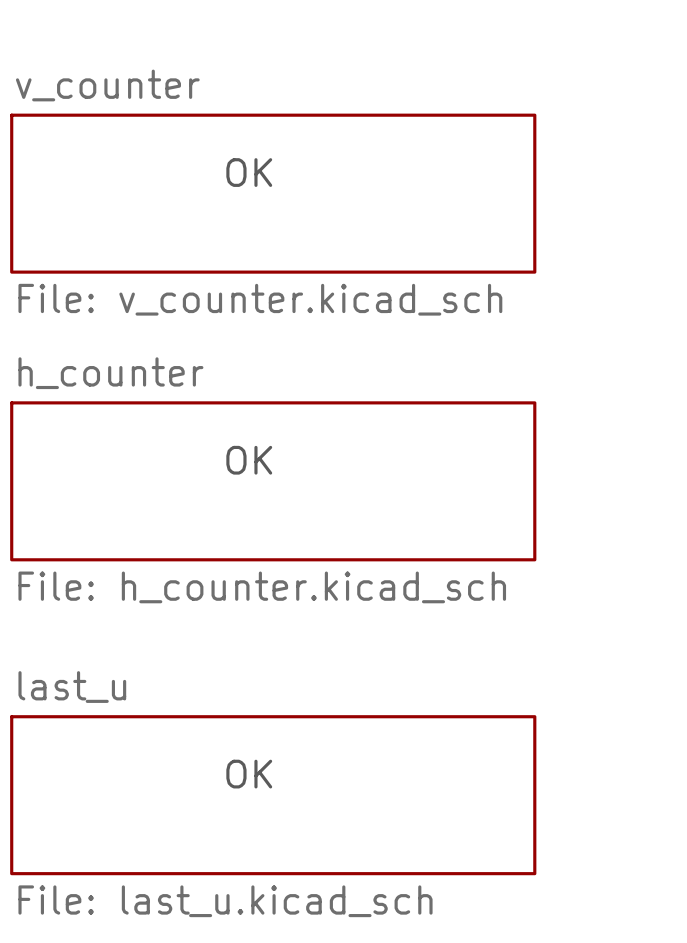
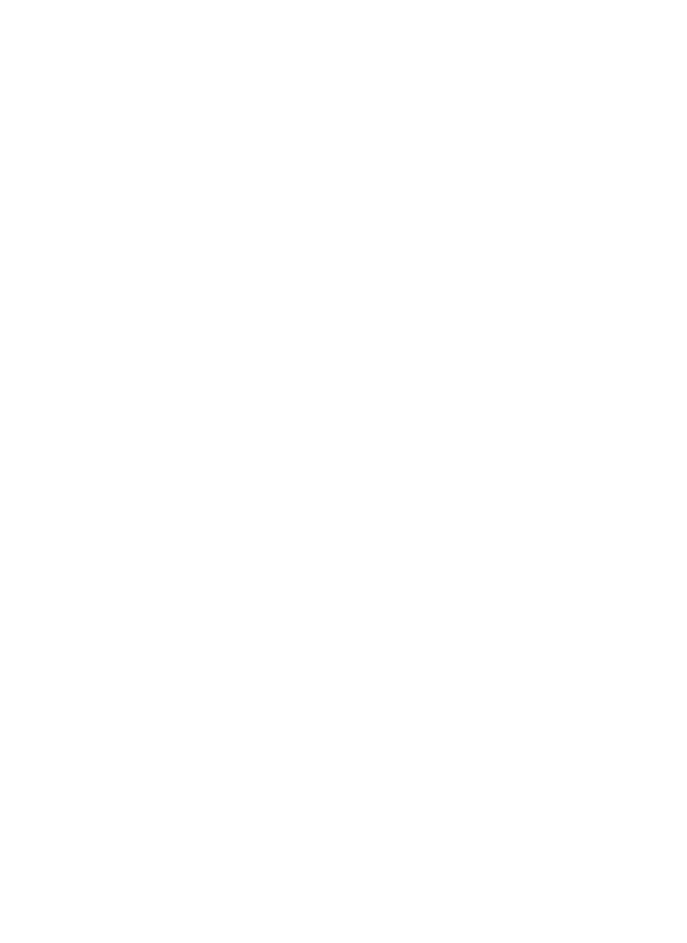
text: OK (249, 172) -> none
sheet v_counter: File: v_counter.kicad_sch (273, 193) -> none
text: OK (249, 460) -> none
sheet h_counter: File: h_counter.kicad_sch (273, 481) -> none
text: OK (249, 774) -> none
sheet last_u: File: last_u.kicad_sch (273, 795) -> none

